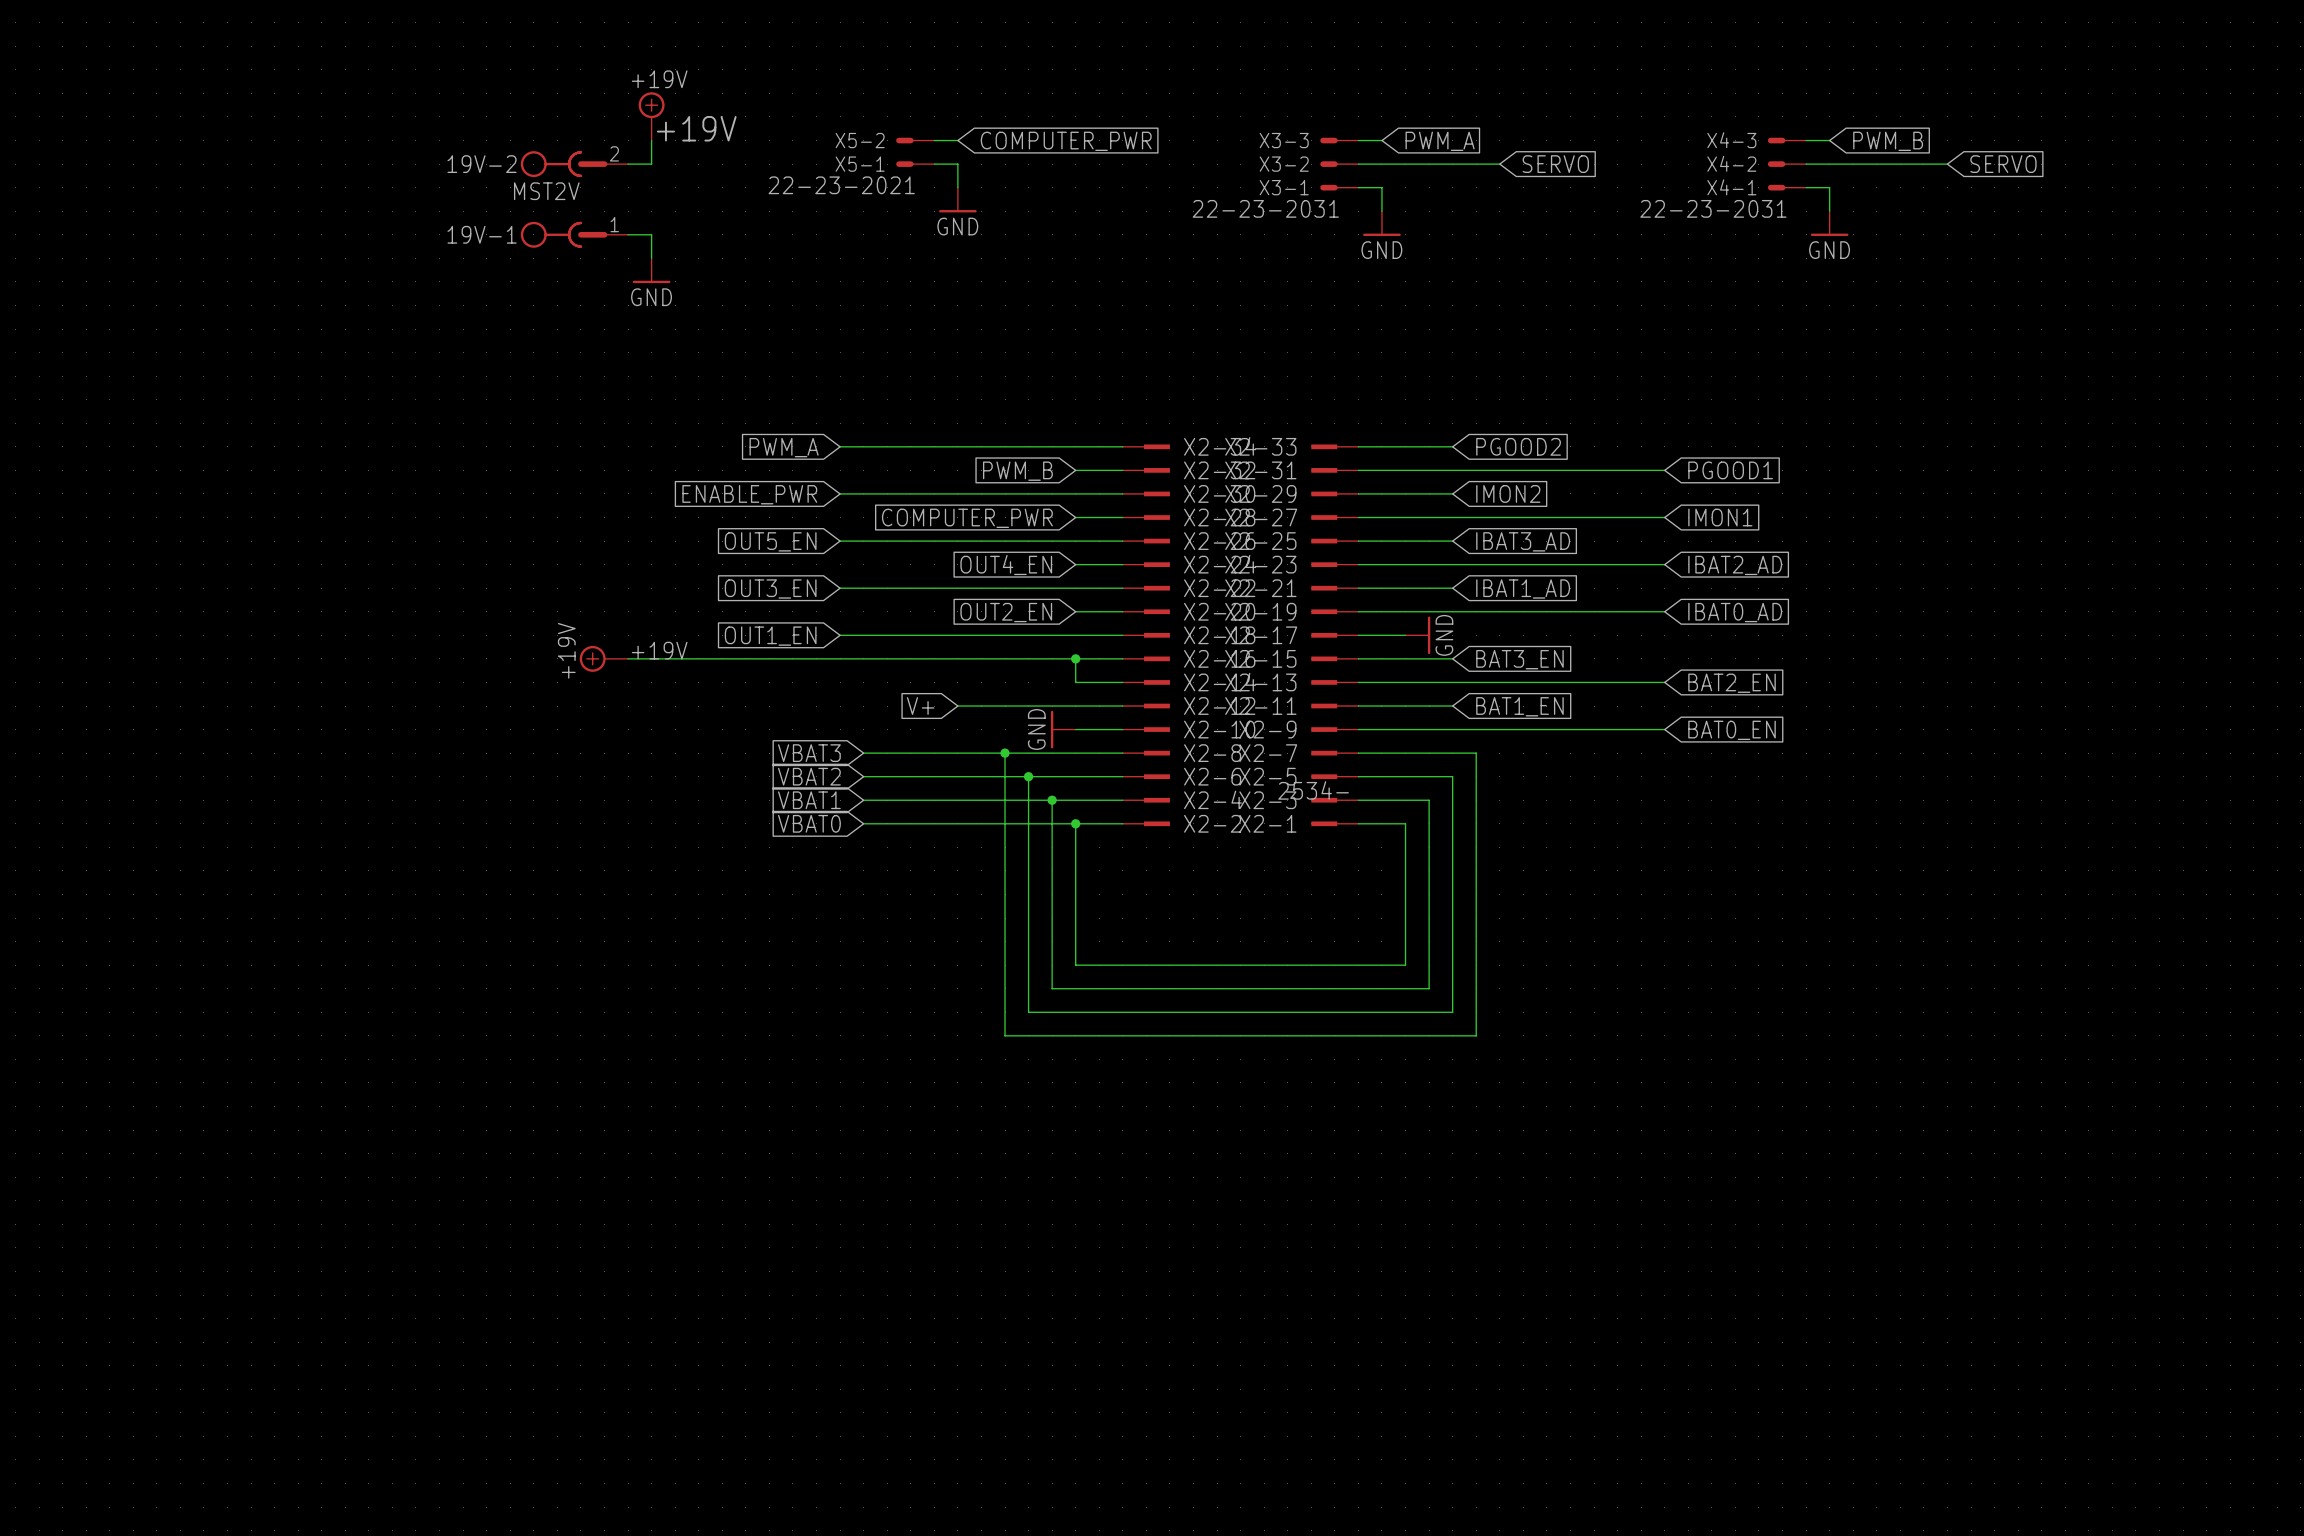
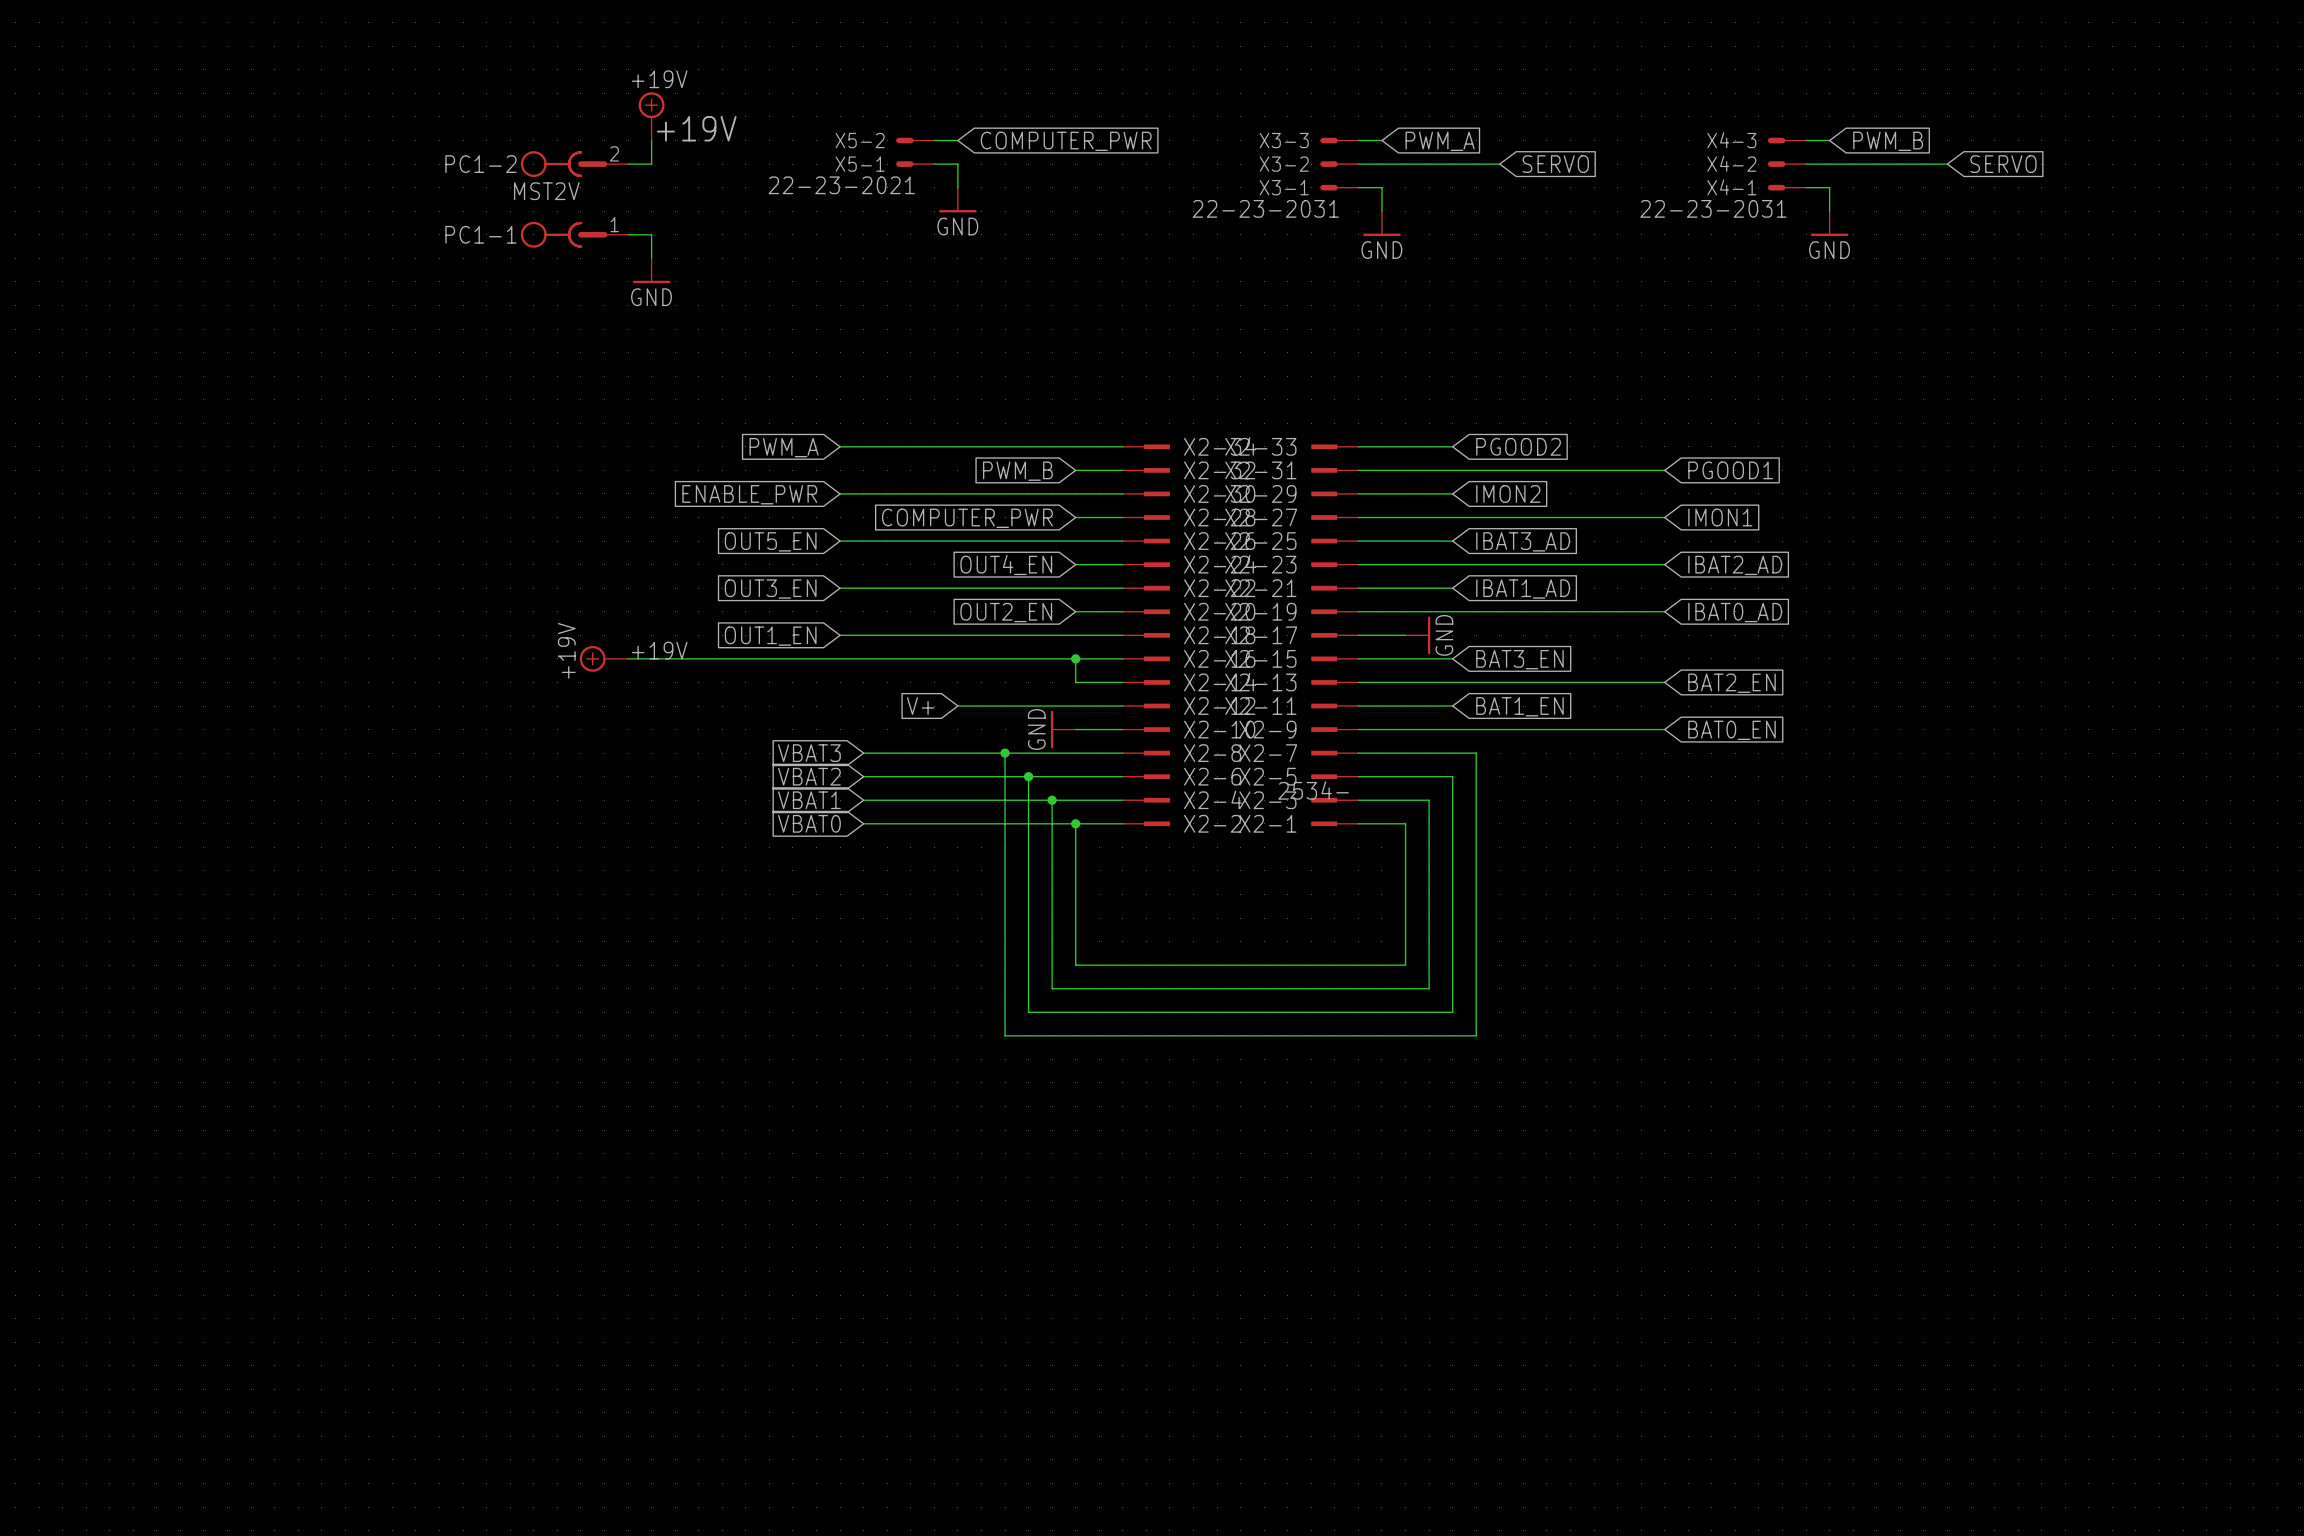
19V-2 name: 19V-2 (482, 164) -> PC1-2 (480, 164)
19V-1 name: 19V-1 (482, 234) -> PC1-1 (480, 234)

